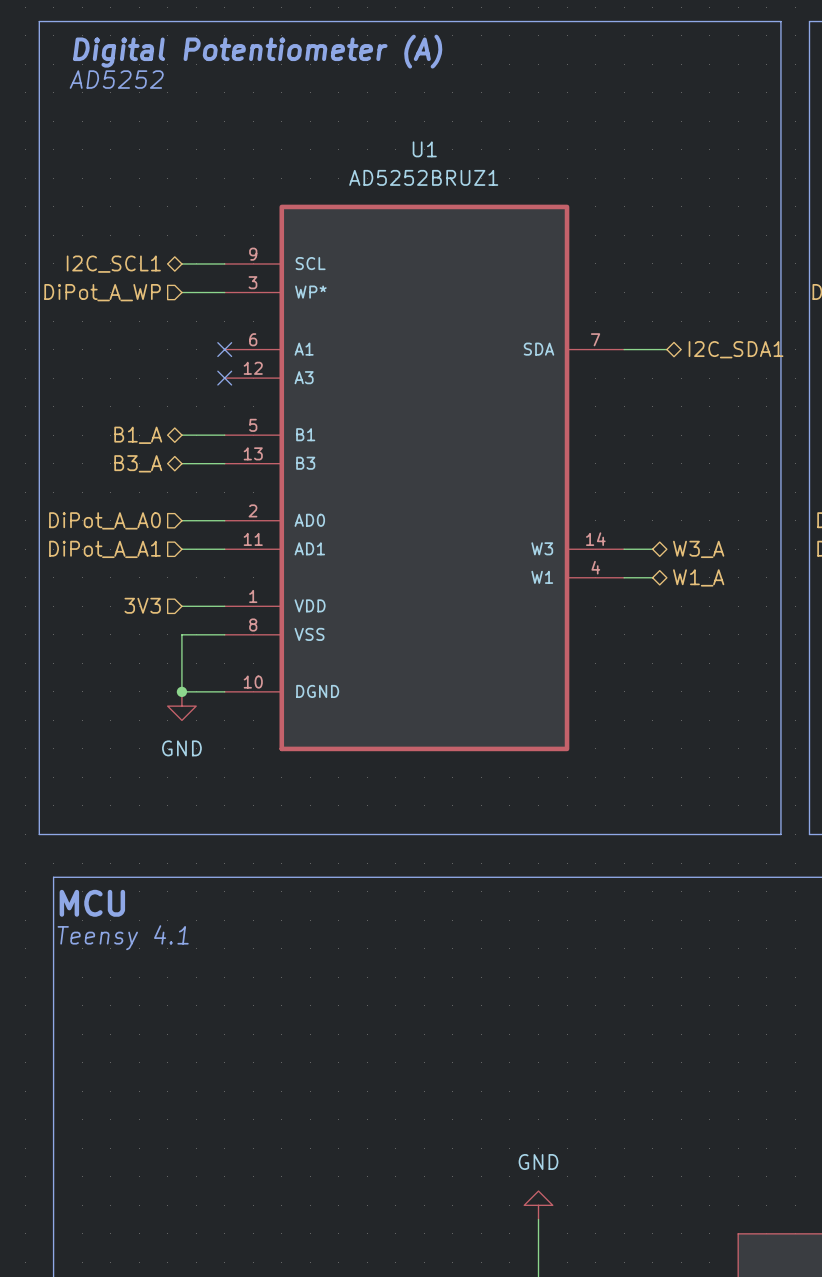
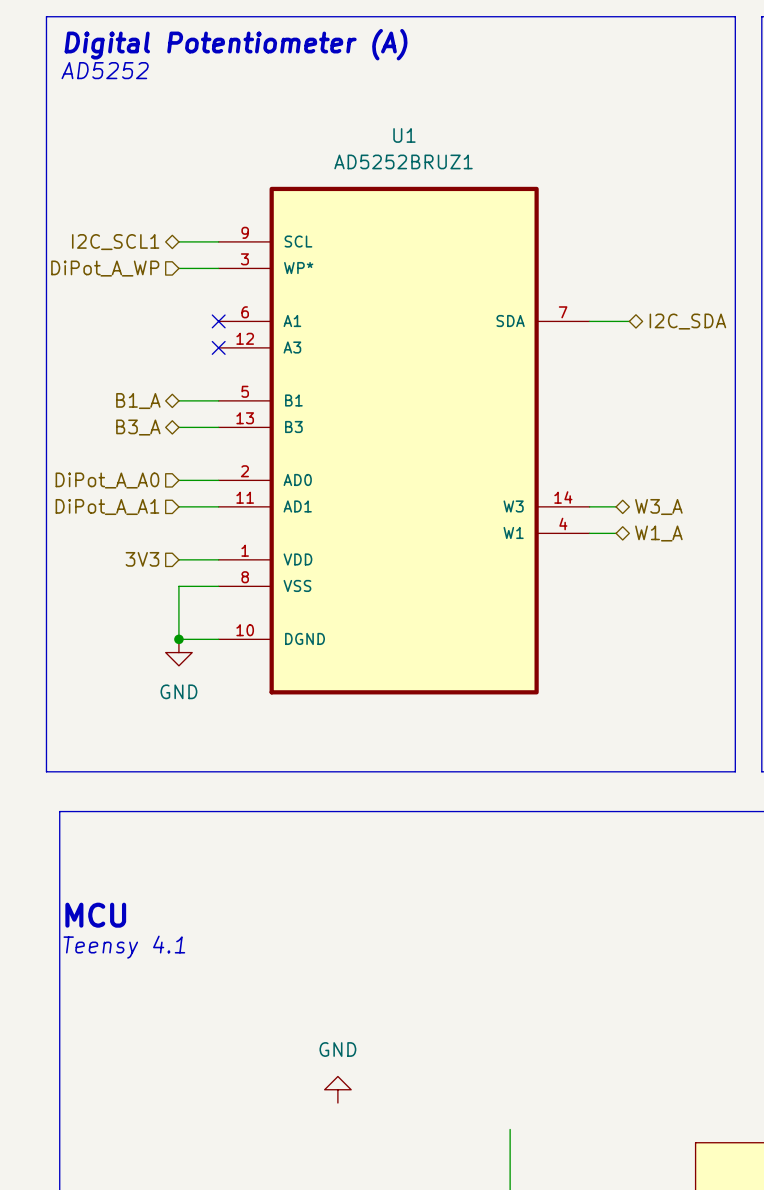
text position: Digital Potentiometer (A) (257, 51) -> Digital Potentiometer (A) (236, 44)
text position: AD5252 (116, 79) -> AD5252 (105, 70)
hierarchical label: I2C_SDA1 (736, 349) -> I2C_SDA (687, 321)
text position: MCU (92, 903) -> MCU (95, 915)
text position: Teensy 4.1 (123, 937) -> Teensy 4.1 (124, 947)
power symbol position: GND (538, 1205) -> GND (337, 1089)

